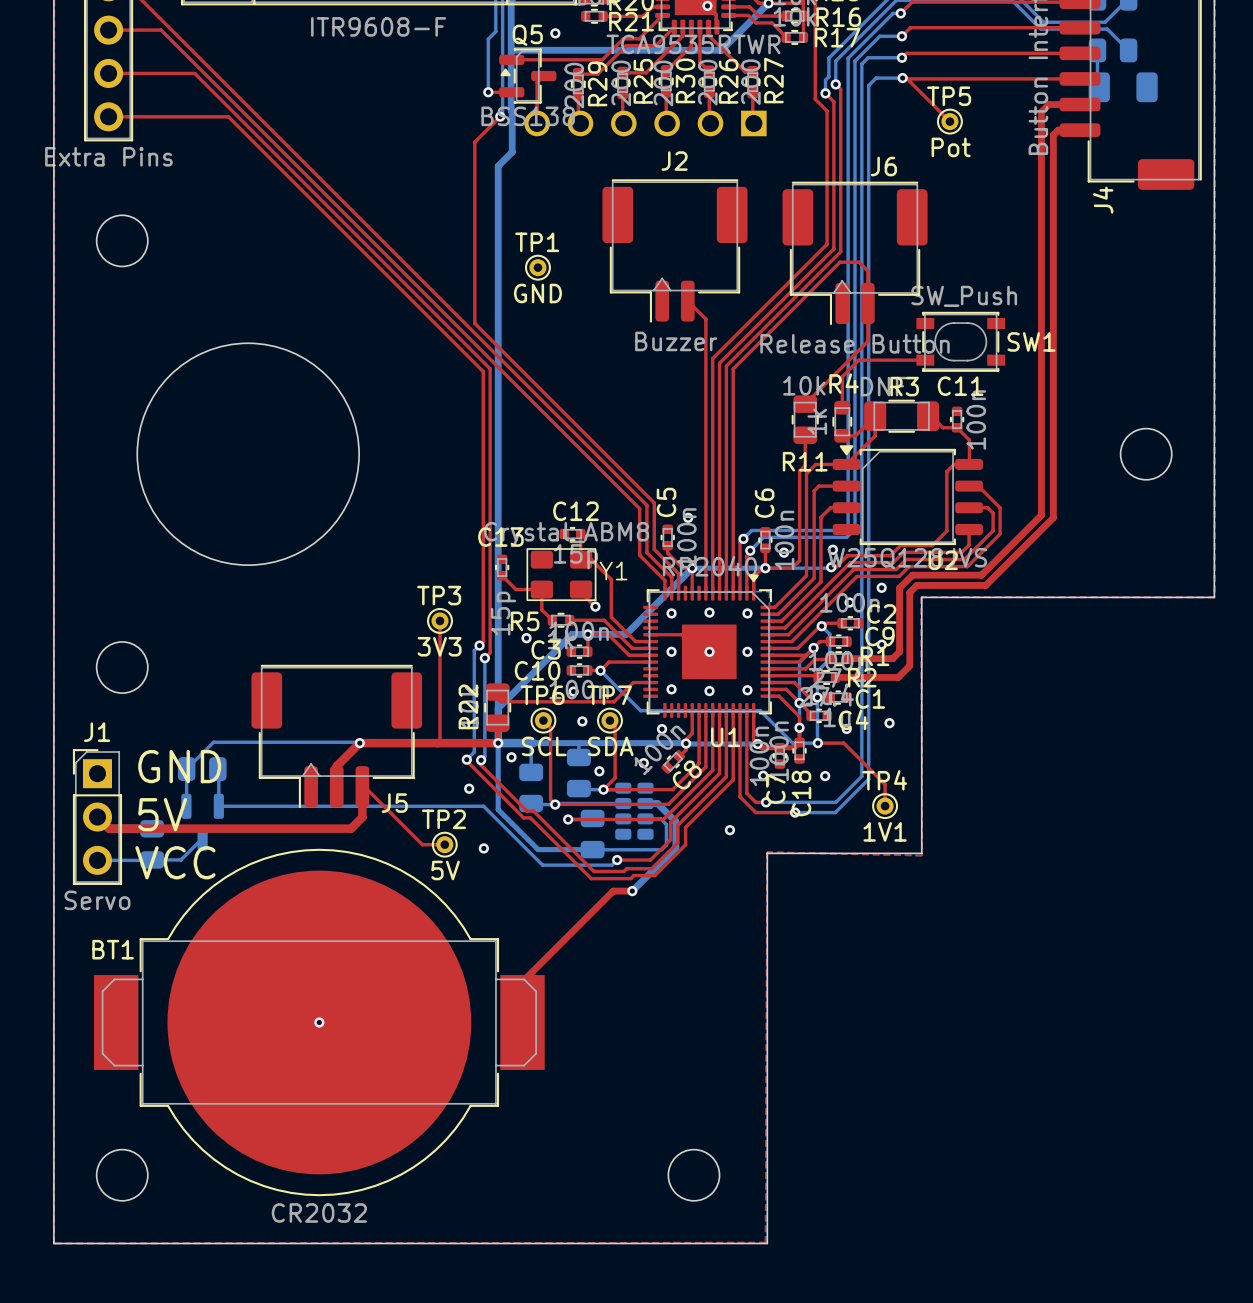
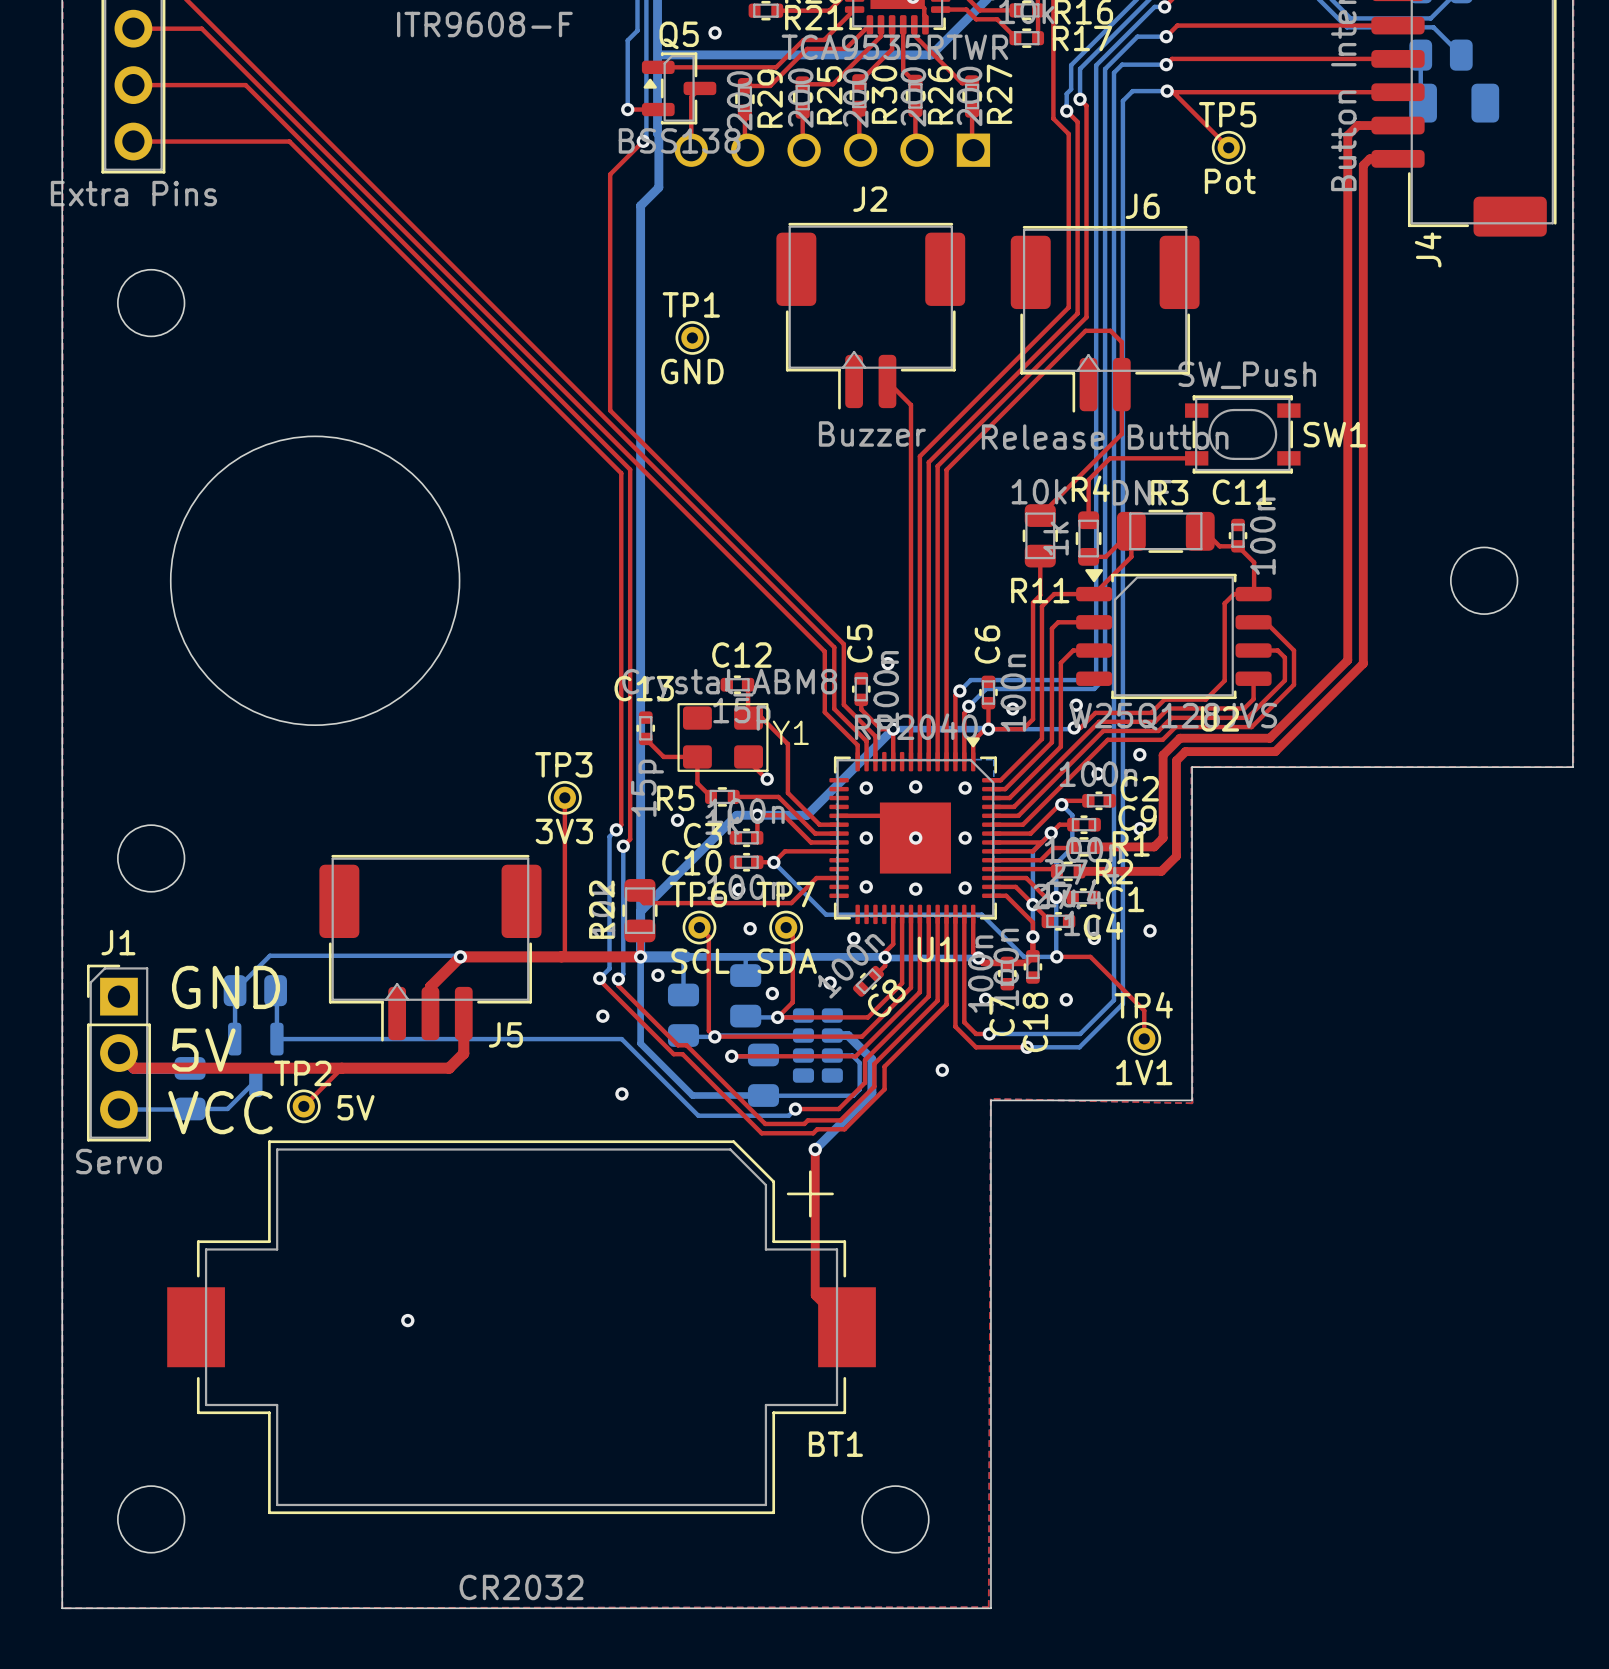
top track: (364, 786) (422, 844) (444, 844) -> none
top track: none -> (341, 1068) (303, 1106)
TP2 position: (444, 844) -> (303, 1106)
BT1 footprint: [93, 848, 545, 1197] -> [167, 1140, 876, 1515]
TP2 value position: 5V (445, 870) -> 5V (355, 1107)
top track: (632, 891) (613, 891) (522, 981) (522, 1022) -> (815, 1149) (815, 1295) (847, 1327)
BT1 name position: BT1 (113, 949) -> BT1 (835, 1444)

